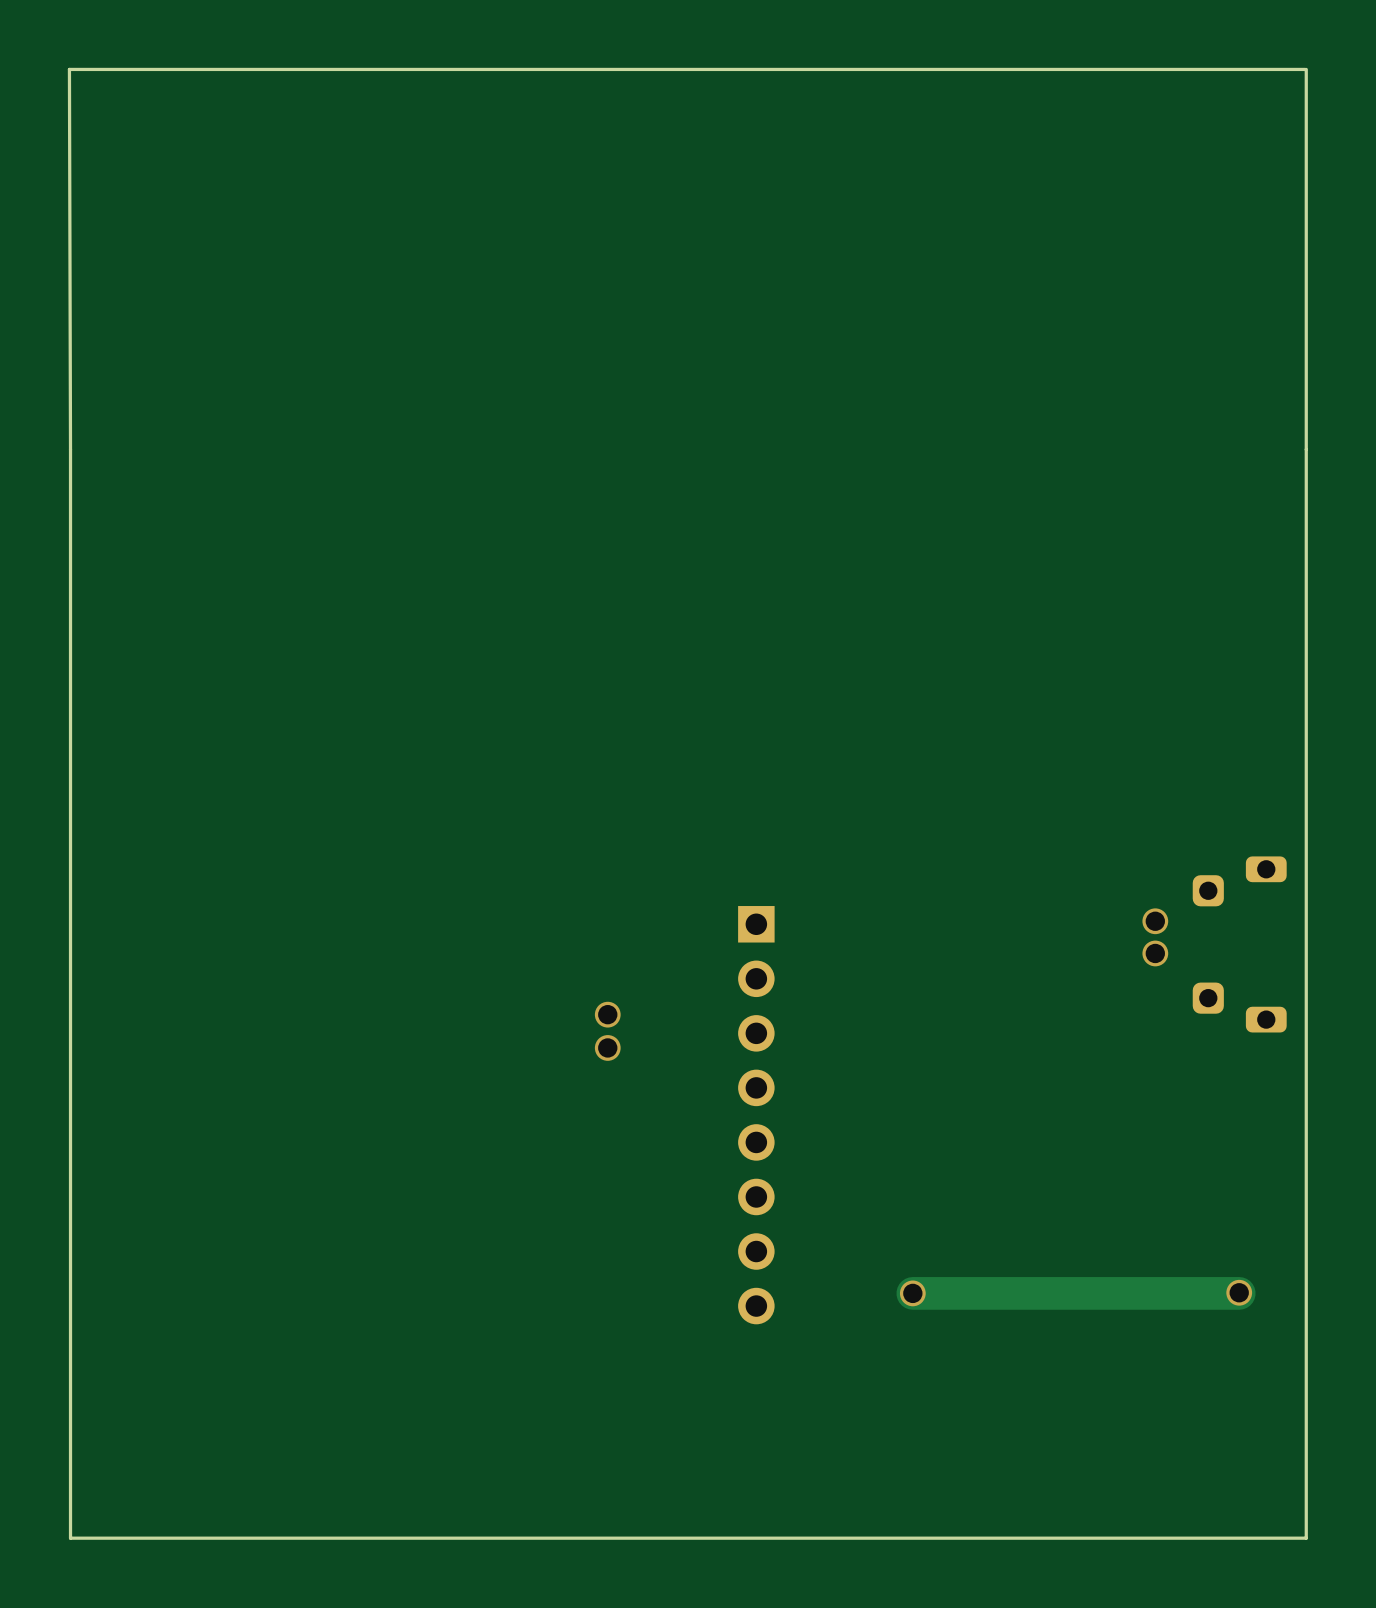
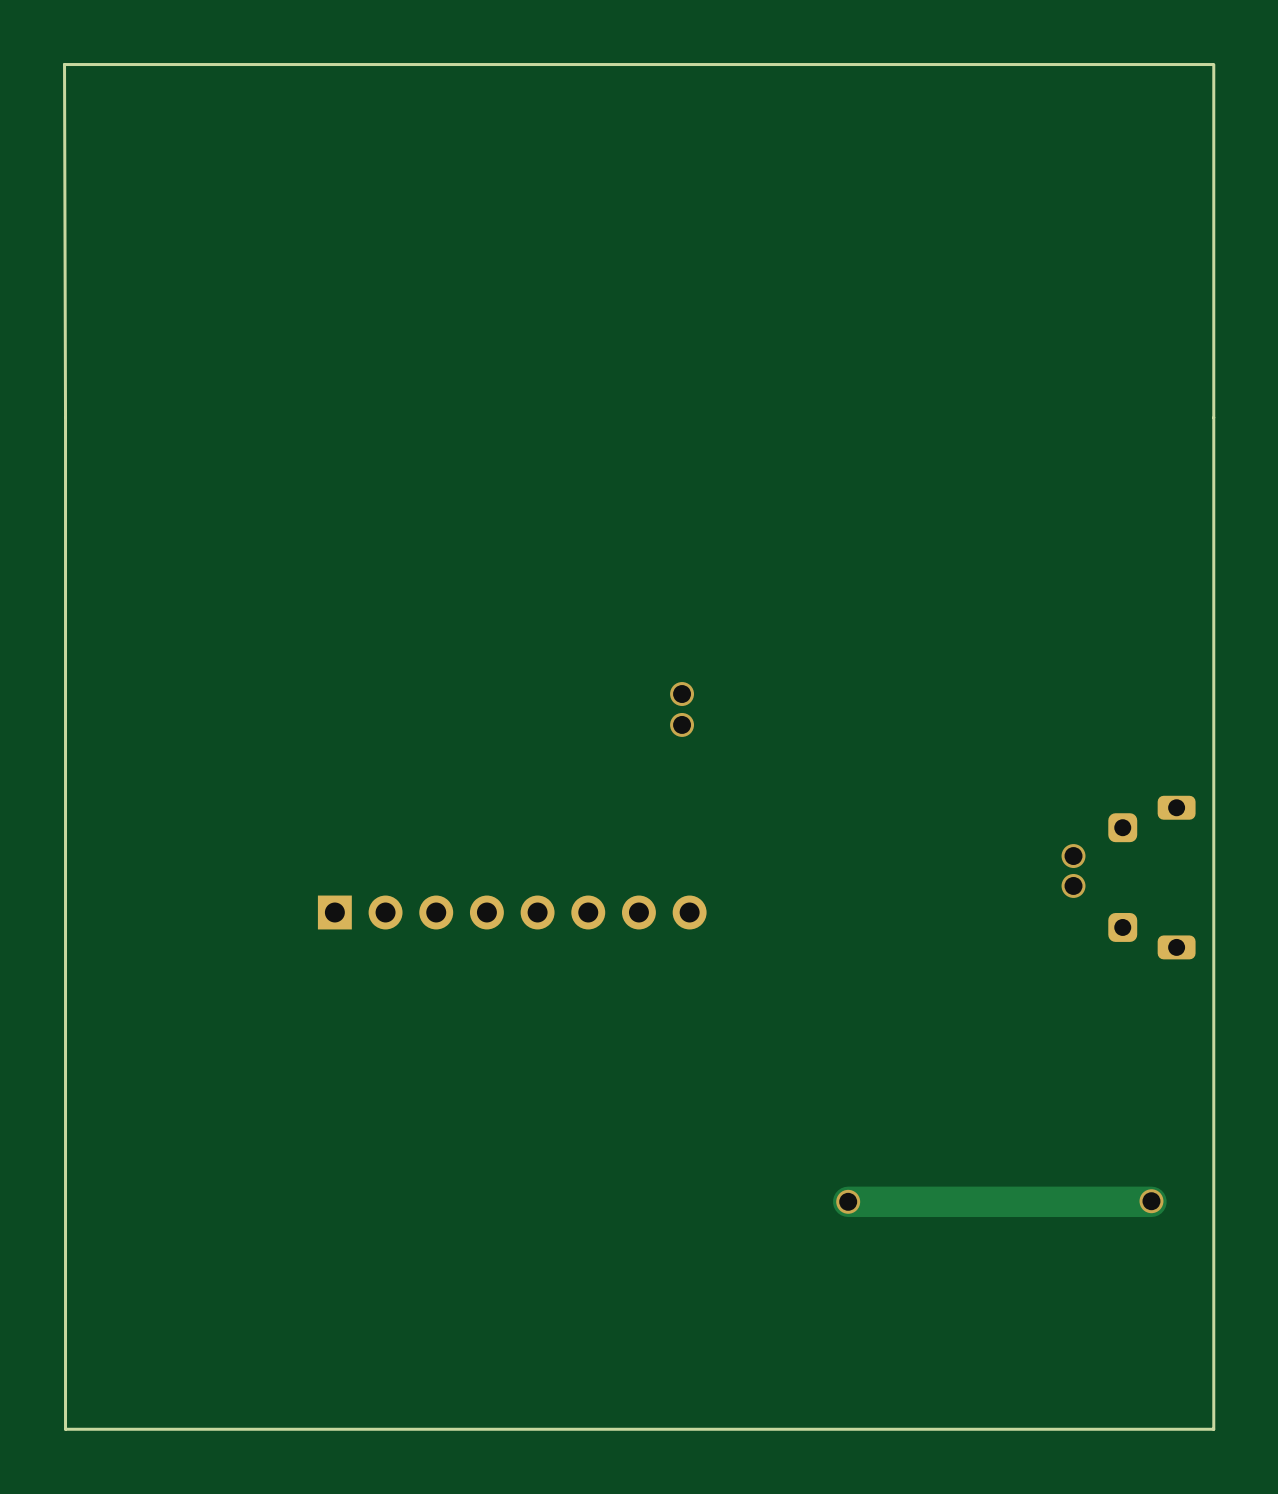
via: none -> (682, 694)
via: none -> (682, 724)
via: (607, 1014) -> none
via: (607, 1047) -> none
part rotation: 0° (756, 1115) -> 90° counterclockwise (512, 912)

